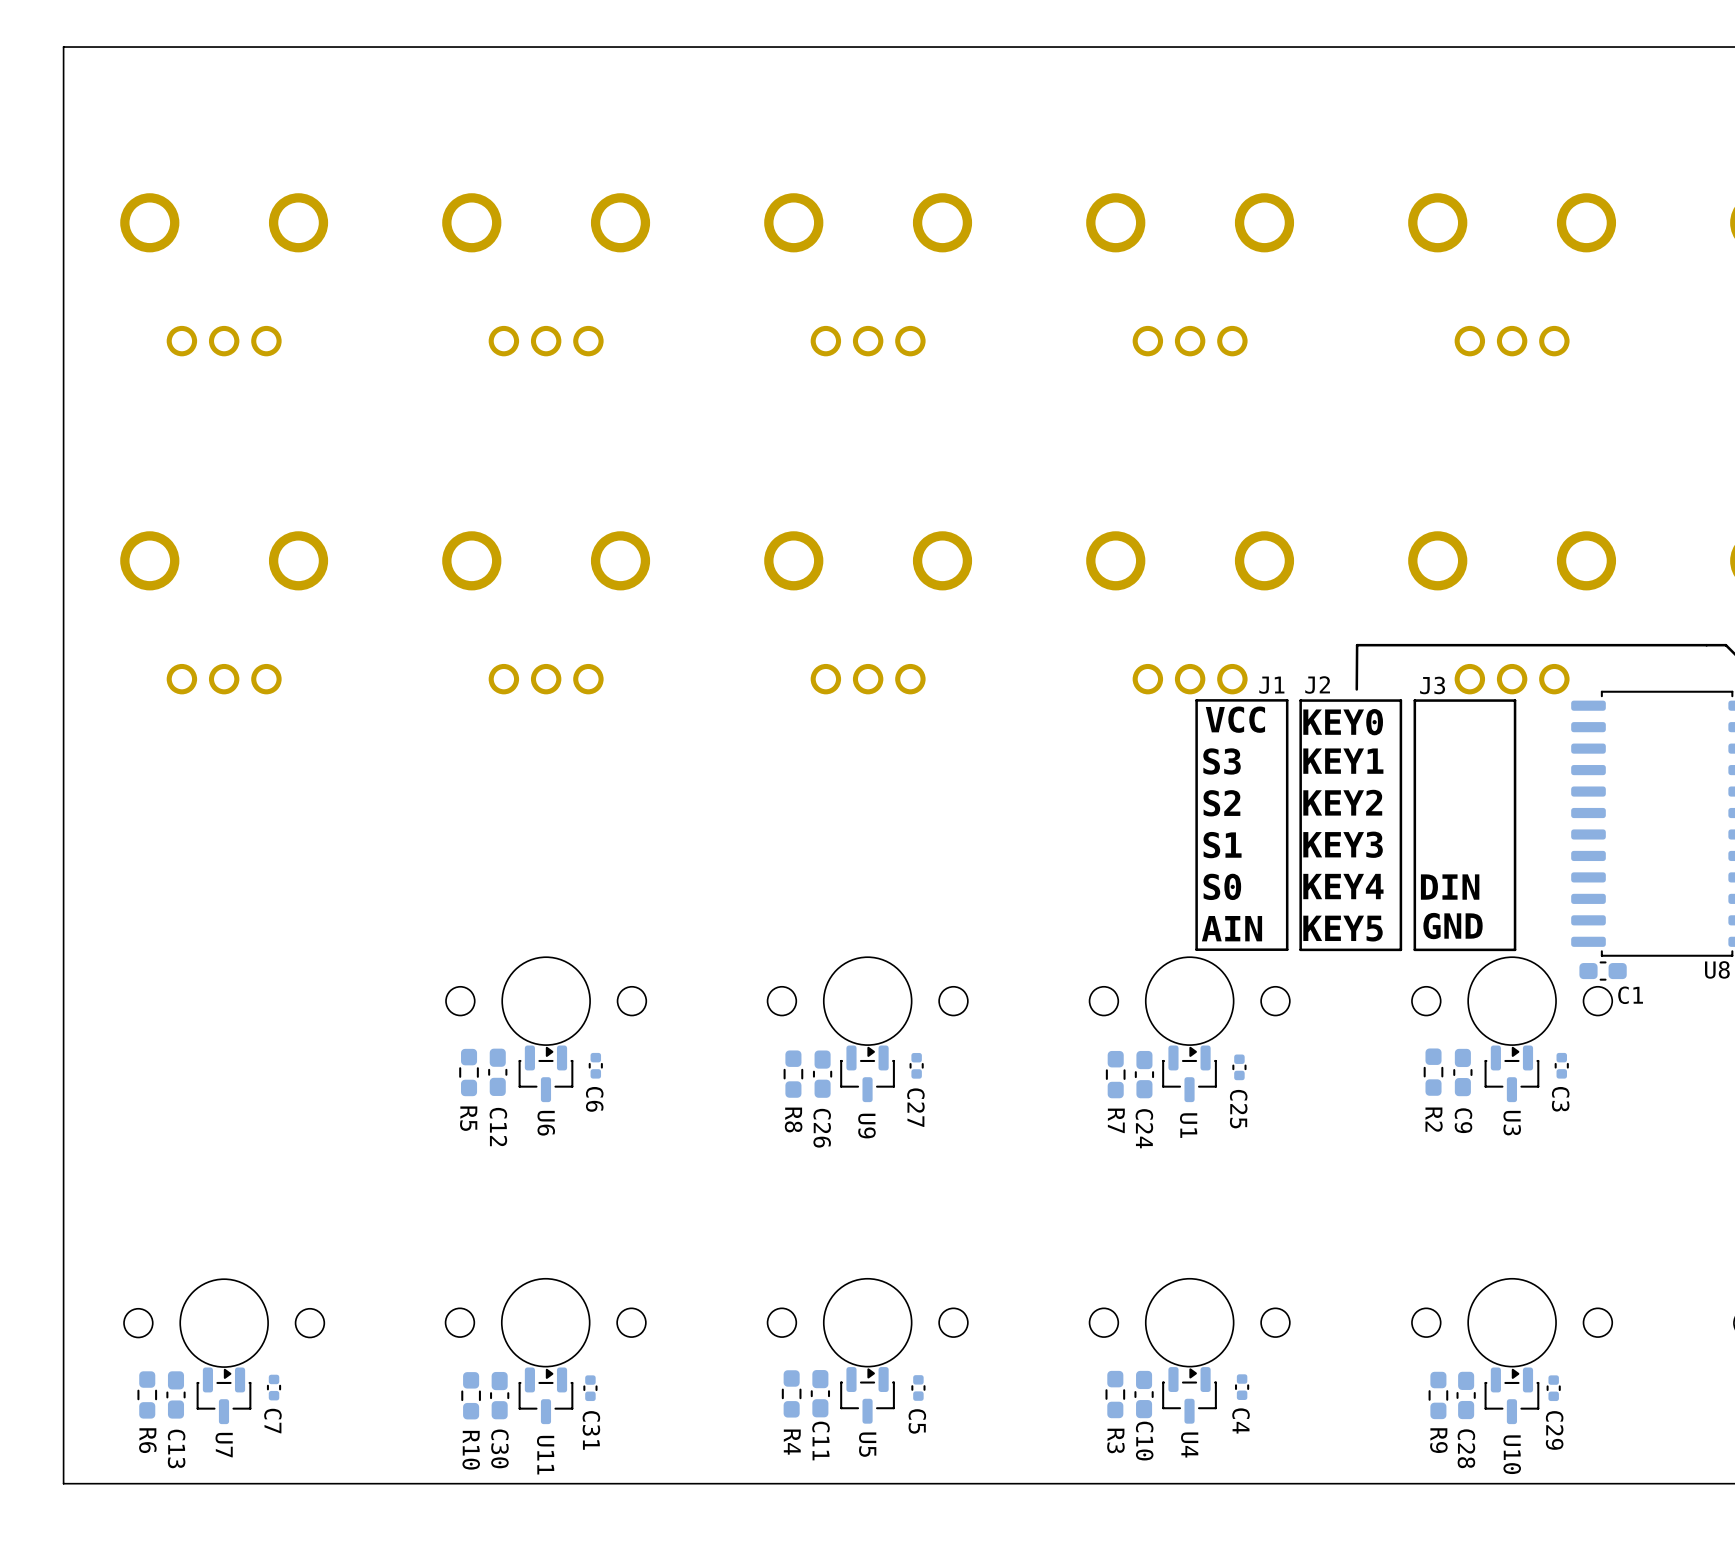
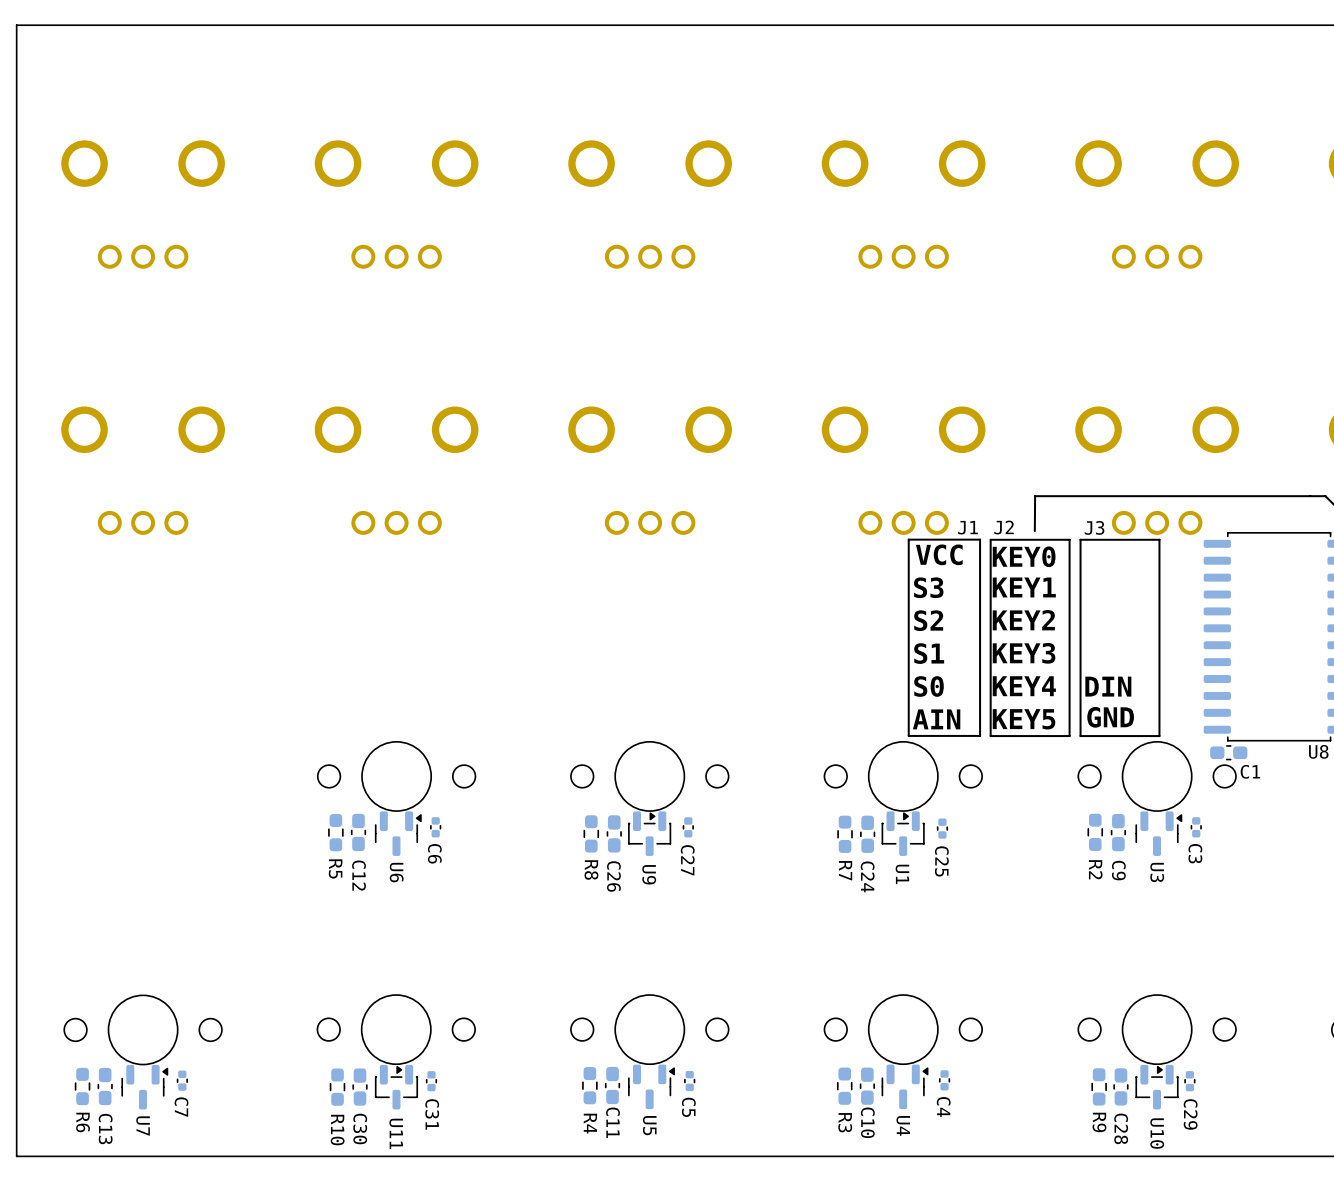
U6 footprint: [518, 1045, 574, 1103] -> [374, 811, 422, 856]
U3 footprint: [1484, 1045, 1540, 1103] -> [1135, 811, 1183, 856]
U7 footprint: [196, 1367, 252, 1425] -> [121, 1064, 169, 1110]
U5 footprint: [840, 1367, 895, 1424] -> [628, 1064, 675, 1110]
U4 footprint: [1162, 1367, 1217, 1424] -> [881, 1064, 929, 1110]

